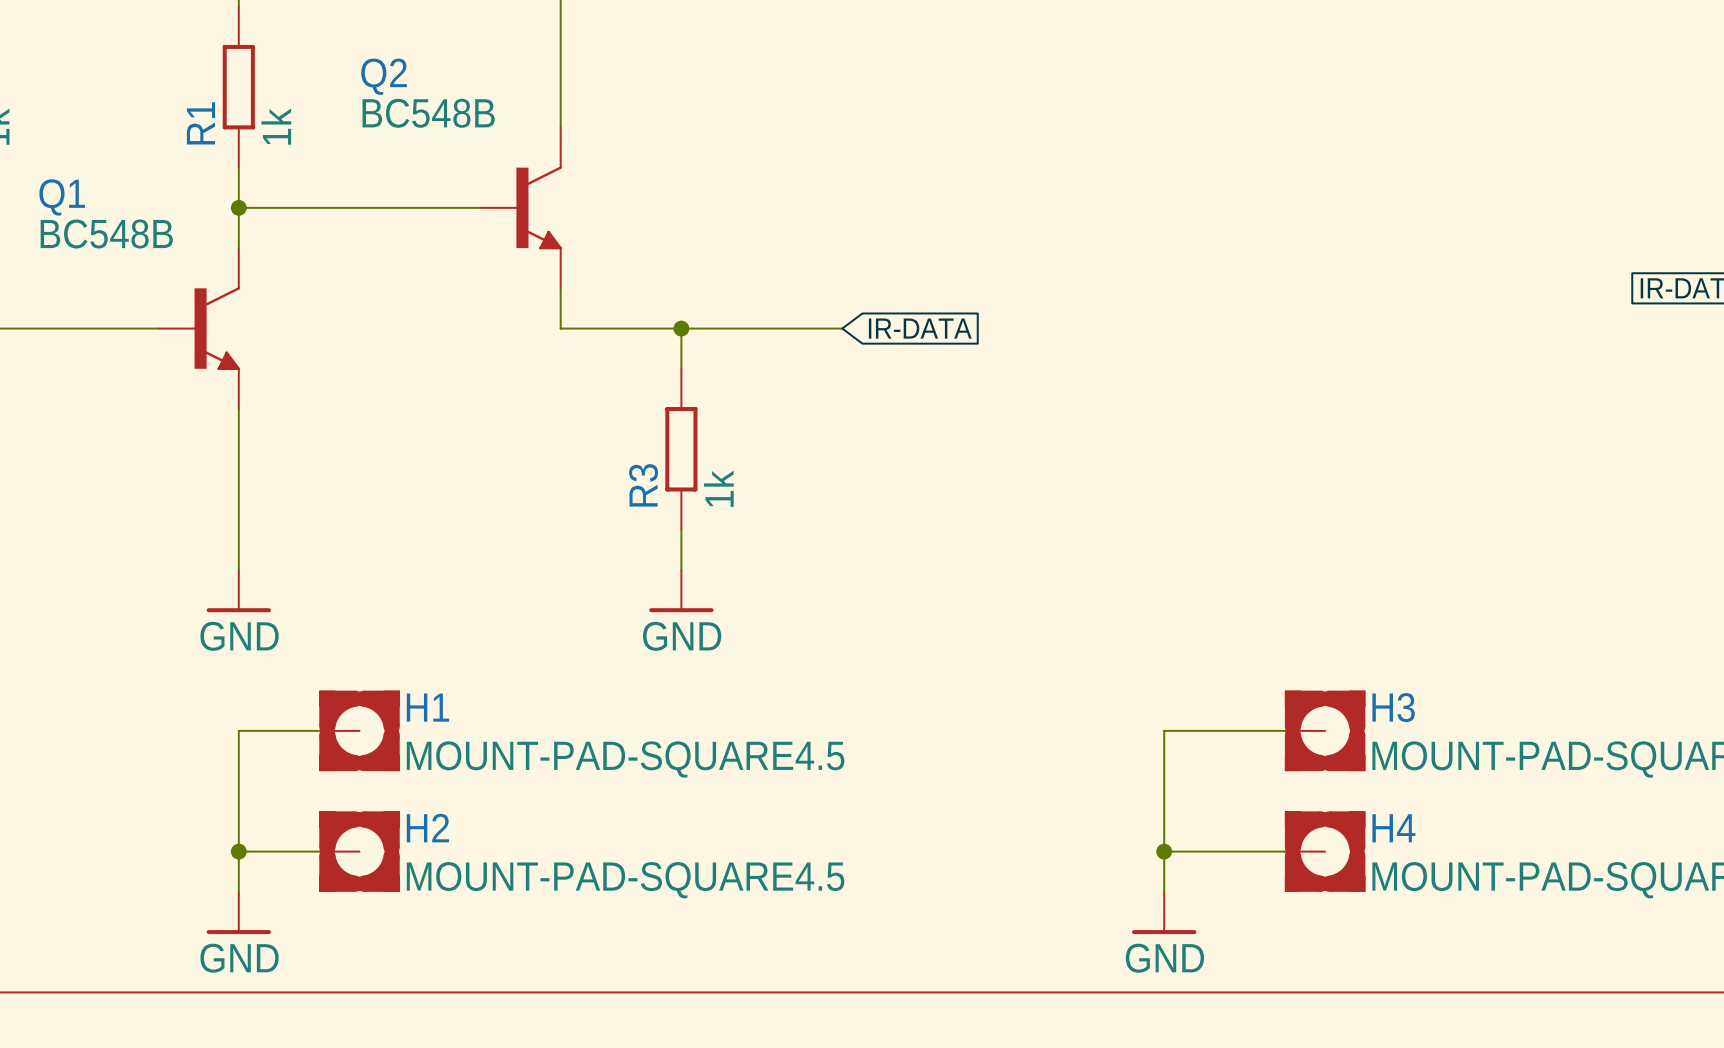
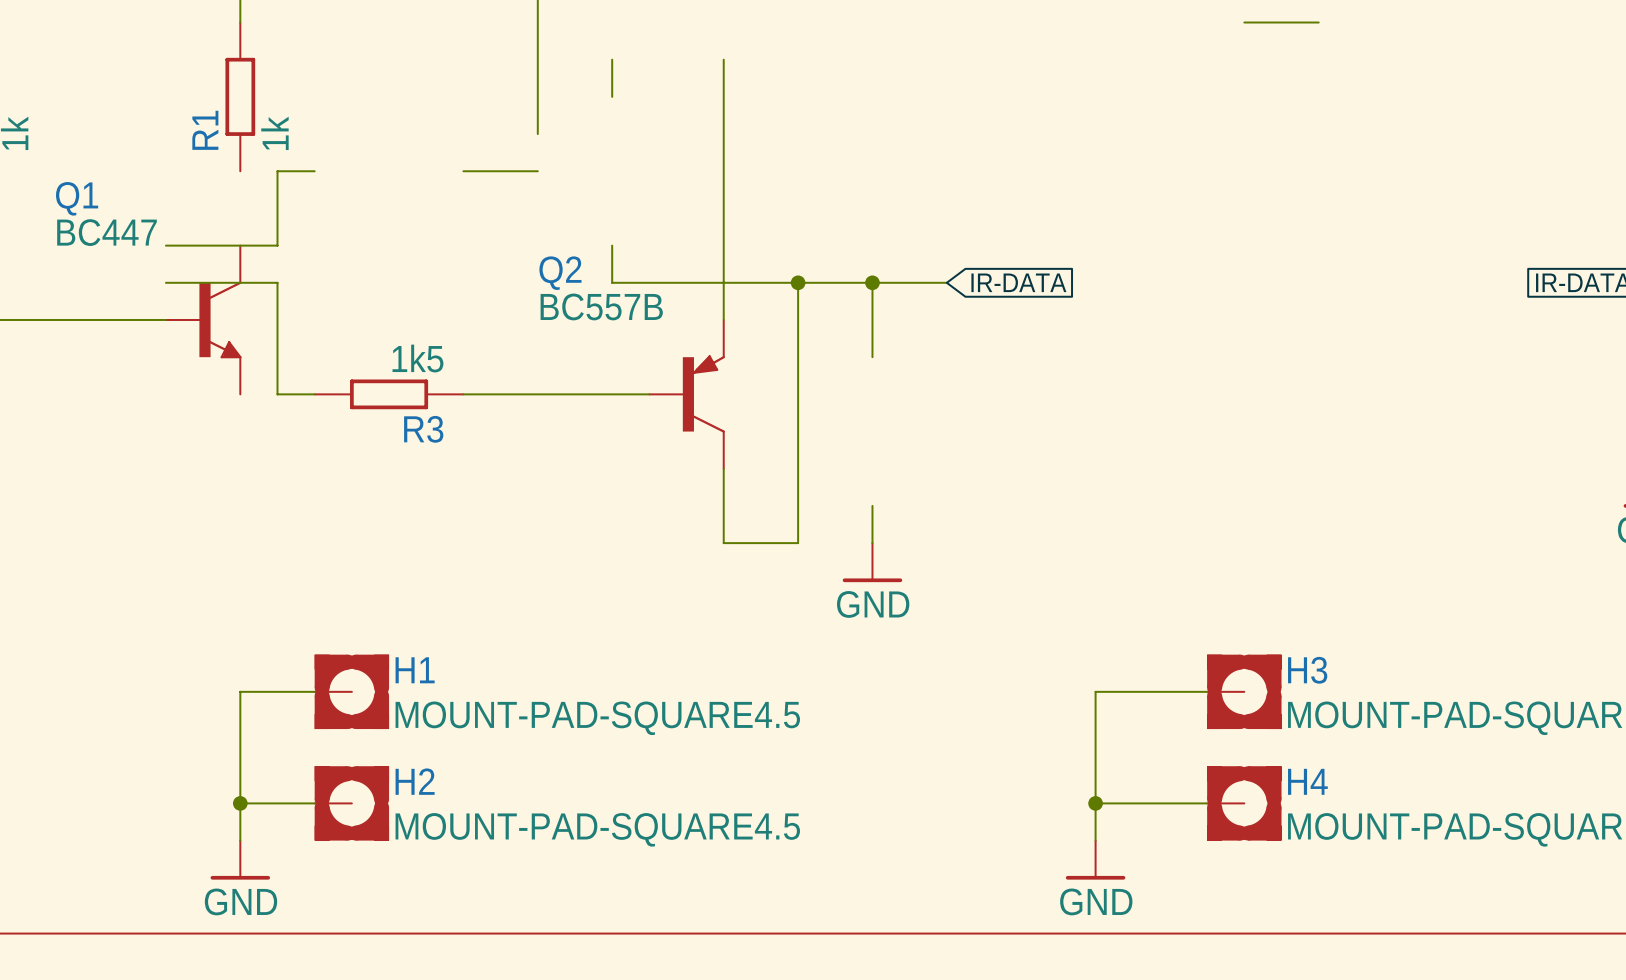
wire: none -> (1244, 22) (1318, 22)
wire: none -> (723, 59) (723, 319)
Q2 value: BC548B (428, 113) -> BC557B (601, 306)
Q2 symbol: [480, 127, 562, 289] -> [649, 319, 725, 469]
wire: (238, 167) (238, 248) -> none
wire: none -> (314, 171) (277, 171) (277, 245) (165, 245)
wire: none -> (463, 171) (537, 171)
wire: (238, 207) (480, 207) -> none
junction: (238, 207) -> none
Q1 value: BC548B (106, 234) -> BC447 (106, 232)
wire: none -> (612, 245) (612, 282) (946, 282)
wire: none -> (165, 282) (277, 282) (277, 394) (314, 394)
wire: (560, 288) (560, 328) (842, 328) -> none
wire: none -> (798, 282) (798, 543) (723, 543) (723, 468)
junction: none -> (798, 282)
wire: none -> (872, 282) (872, 357)
junction: none -> (872, 282)
wire: (681, 328) (681, 368) -> (612, 59) (612, 96)
junction: (681, 328) -> none
global label position: IR-DATA (920, 328) -> IR-DATA (1018, 282)
wire: (238, 409) (238, 569) -> none
wire: none -> (463, 394) (649, 394)
R3 rotation: 0° (681, 449) -> 90° clockwise (389, 394)
R3 position: (681, 449) -> (389, 394)
R3 name position: R3 (643, 485) -> R3 (423, 429)
R3 value: 1k (718, 488) -> 1k5 (417, 358)
wire: (681, 529) (681, 569) -> (872, 505) (872, 543)
power symbol: GND (238, 591) -> none
power symbol position: GND (681, 591) -> GND (872, 562)

